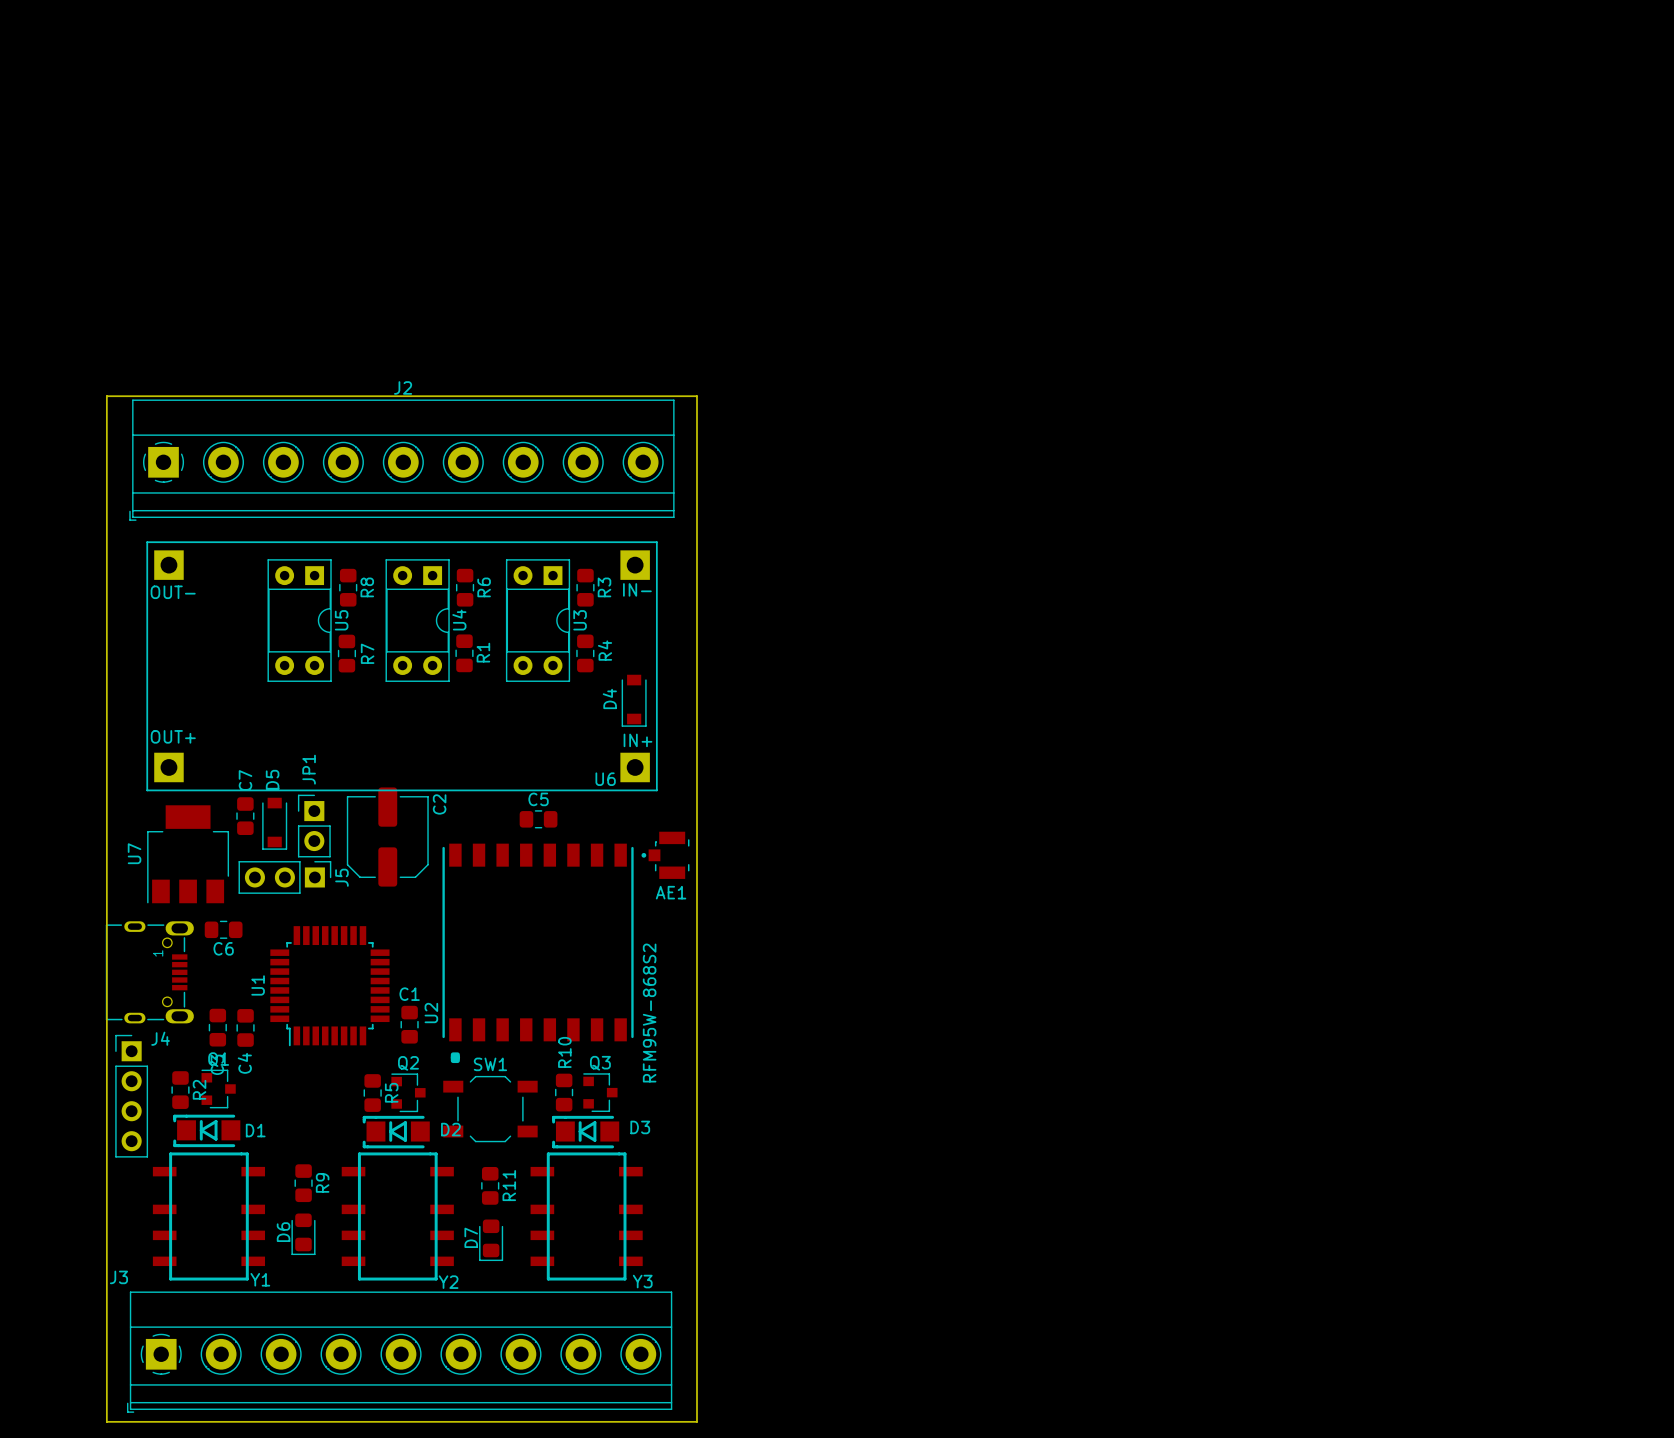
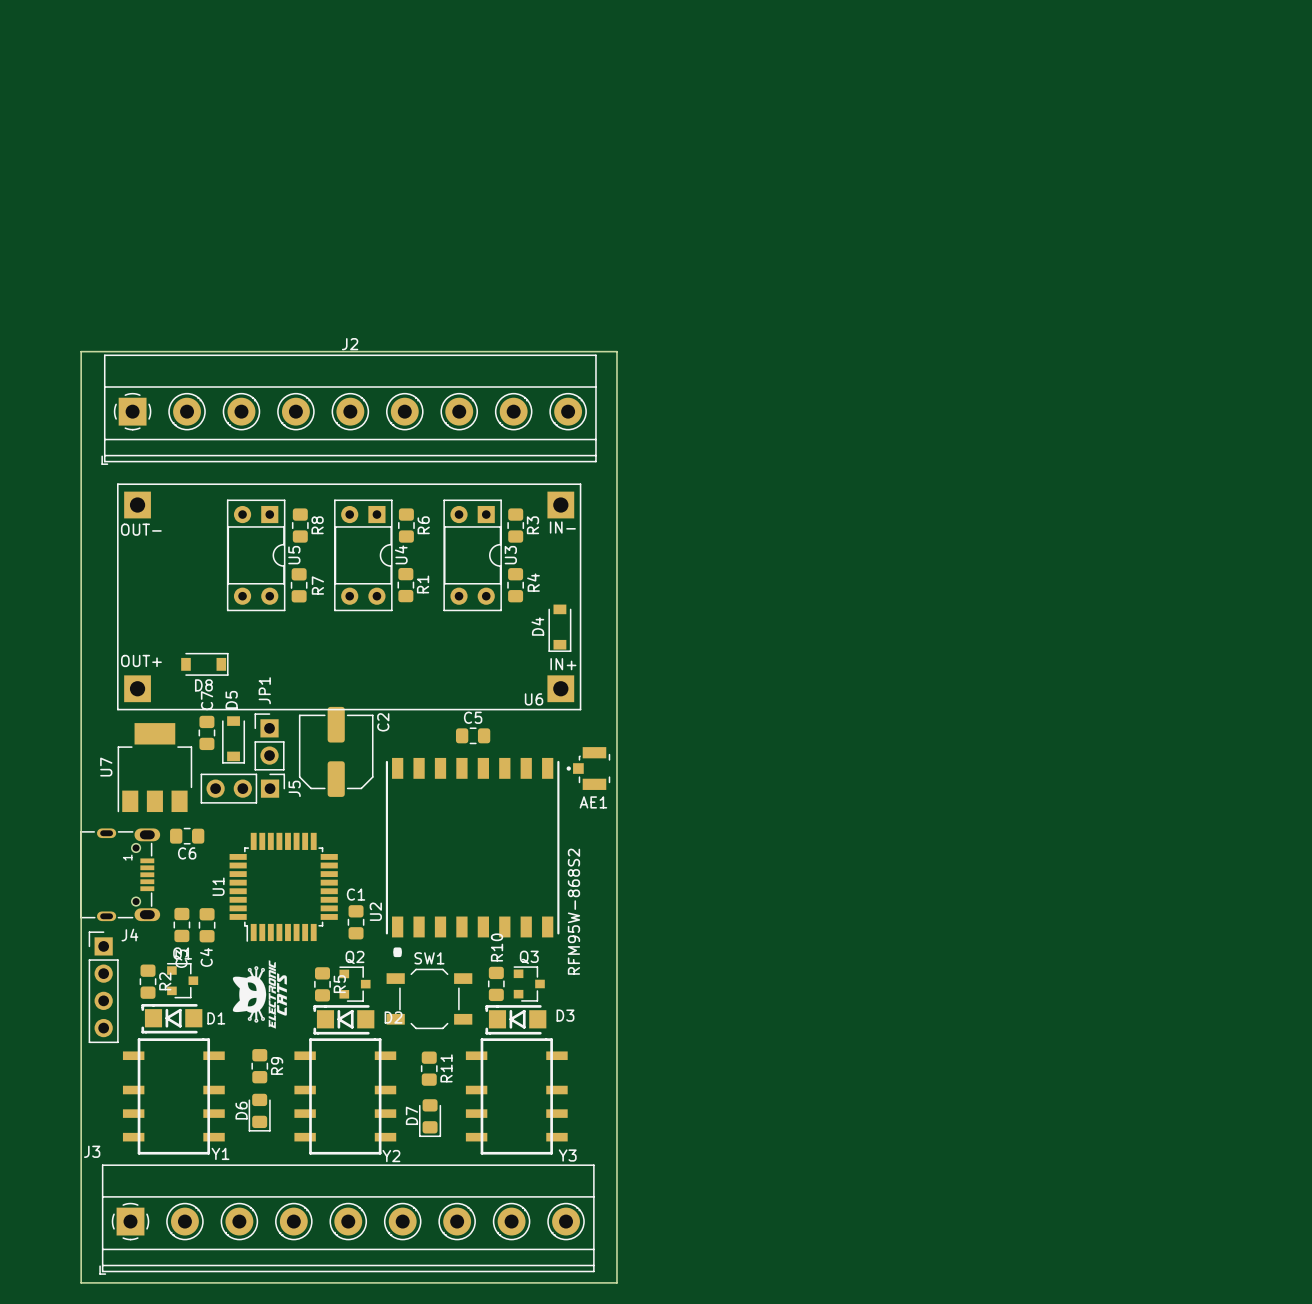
D8: none -> (204, 664)
drawing: none -> [232, 960, 287, 1029]

